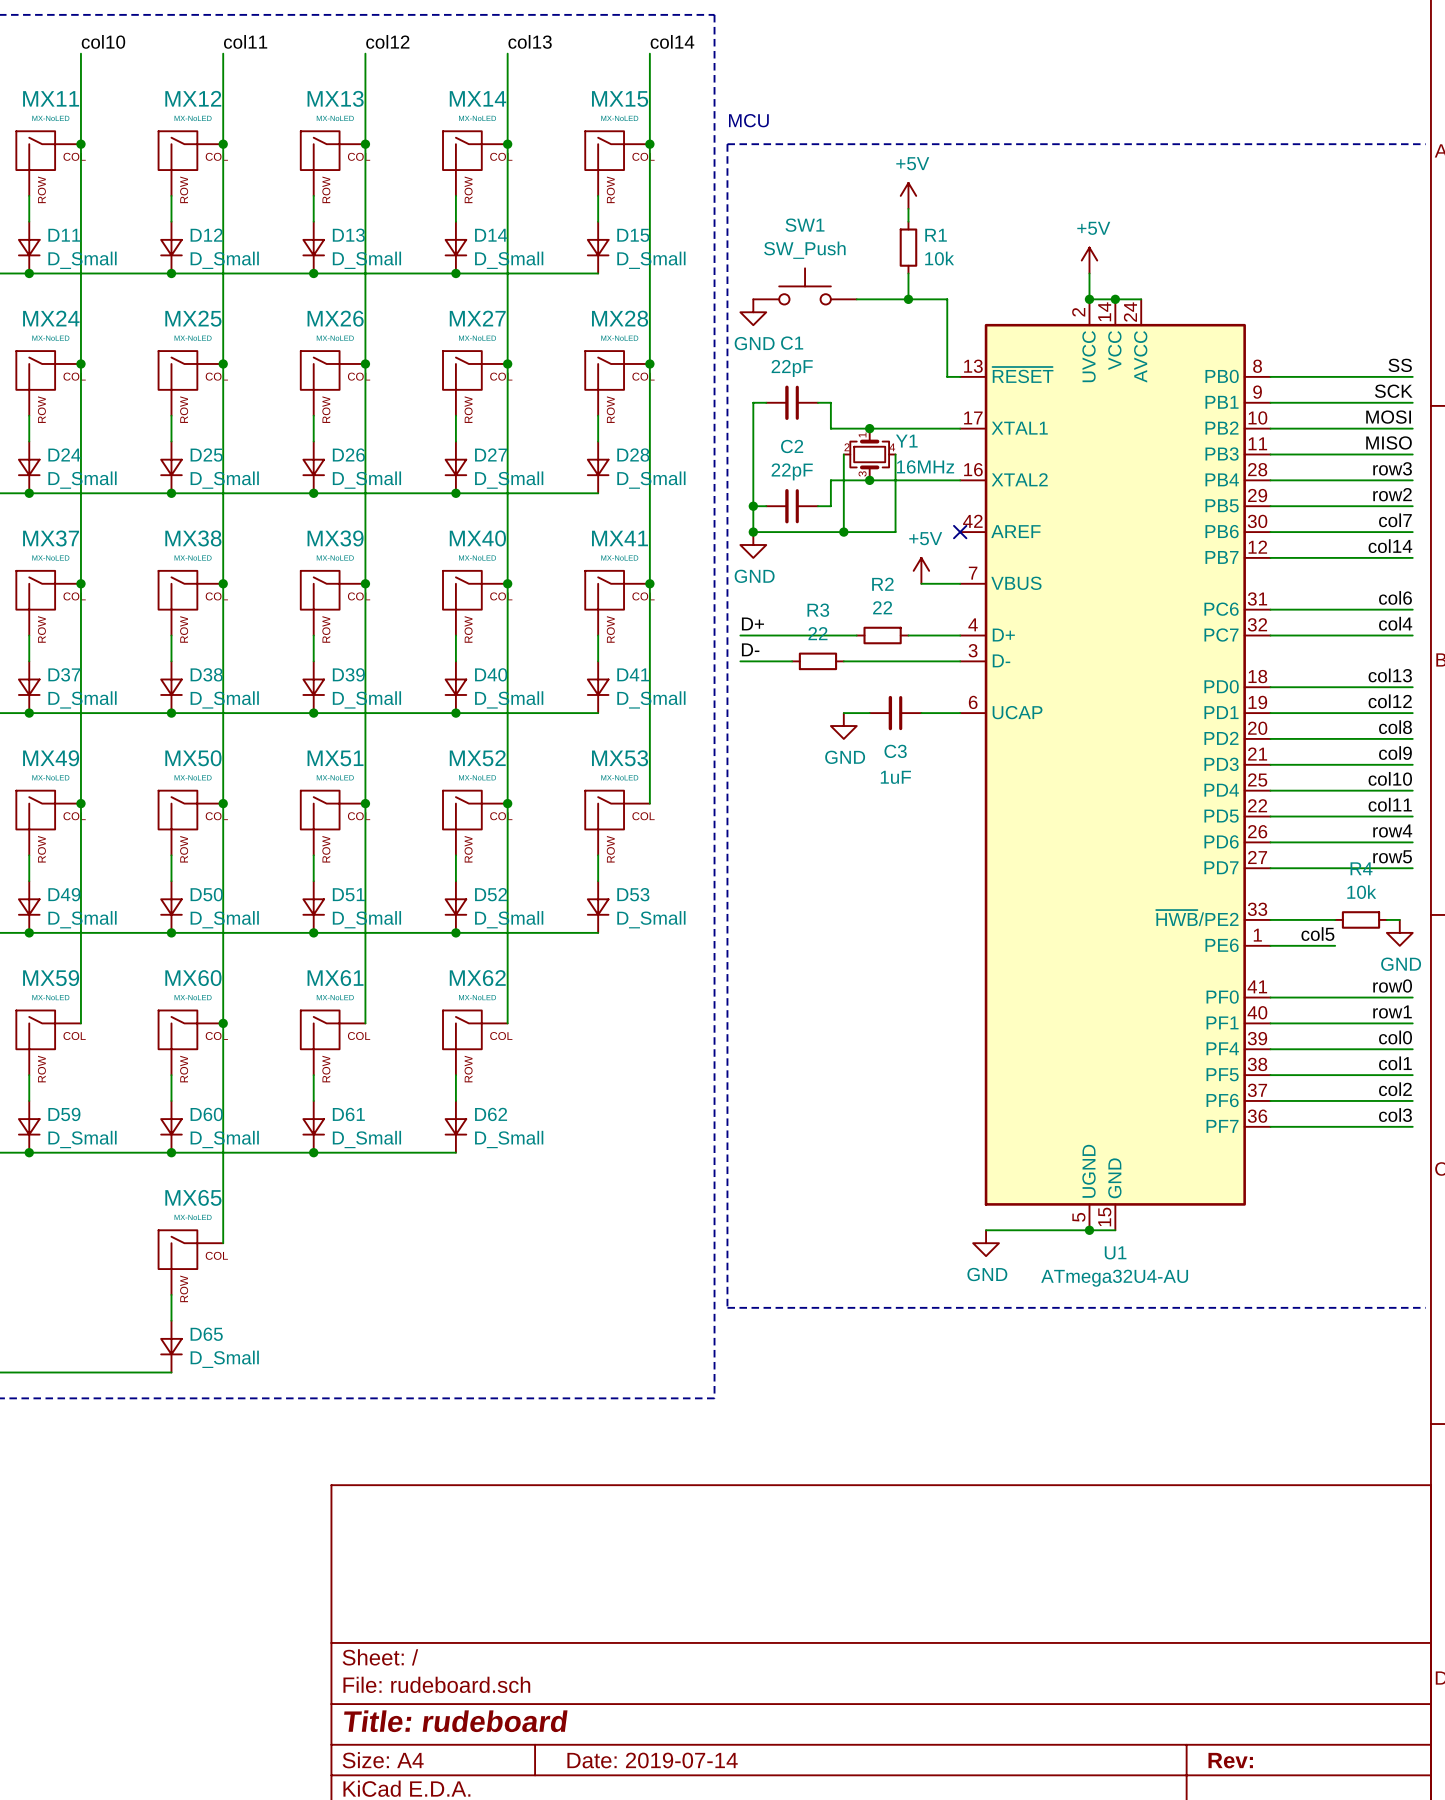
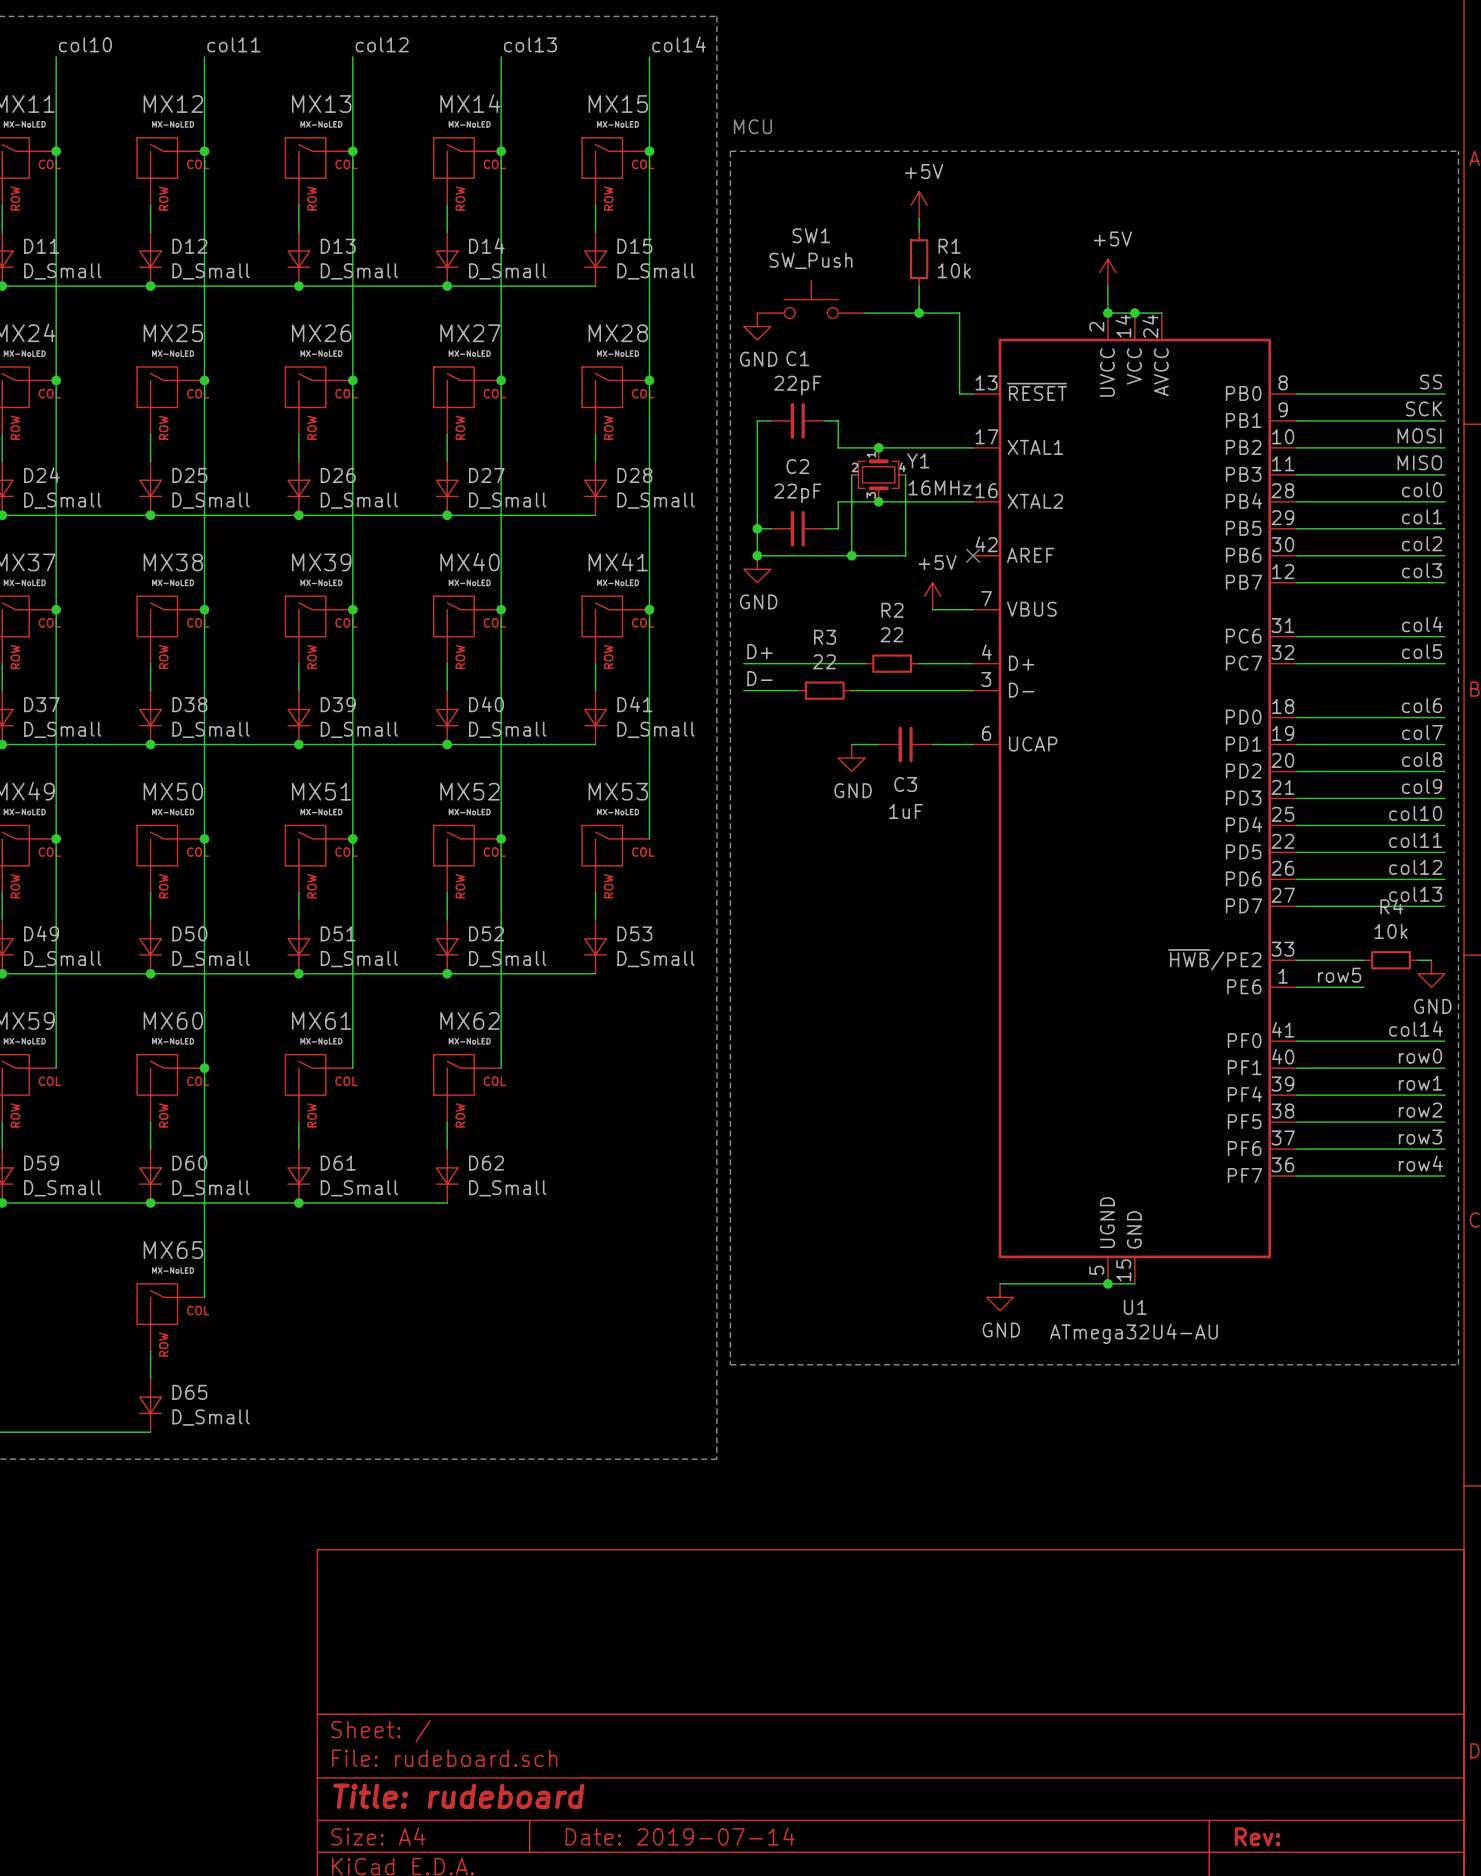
line: none -> (1458, 151) (1458, 1364)
label: row3 (1392, 468) -> col0 (1422, 489)
label: row2 (1392, 494) -> col1 (1422, 516)
label: col7 (1395, 520) -> col2 (1422, 543)
label: col14 (1390, 546) -> col3 (1422, 570)
label: col6 (1395, 597) -> col4 (1422, 624)
label: col4 (1395, 623) -> col5 (1422, 651)
label: col13 (1390, 675) -> col6 (1422, 705)
label: col12 (1390, 701) -> col7 (1422, 732)
label: row4 (1392, 830) -> col12 (1415, 867)
label: row5 (1392, 856) -> col13 (1415, 894)
label: col5 (1317, 934) -> row5 (1339, 975)
label: row0 (1392, 986) -> col14 (1415, 1028)
label: row1 (1392, 1011) -> row0 (1420, 1056)
label: col0 (1395, 1037) -> row1 (1420, 1083)
label: col1 (1395, 1063) -> row2 (1420, 1110)
label: col2 (1395, 1089) -> row3 (1420, 1137)
label: col3 (1395, 1115) -> row4 (1420, 1163)

